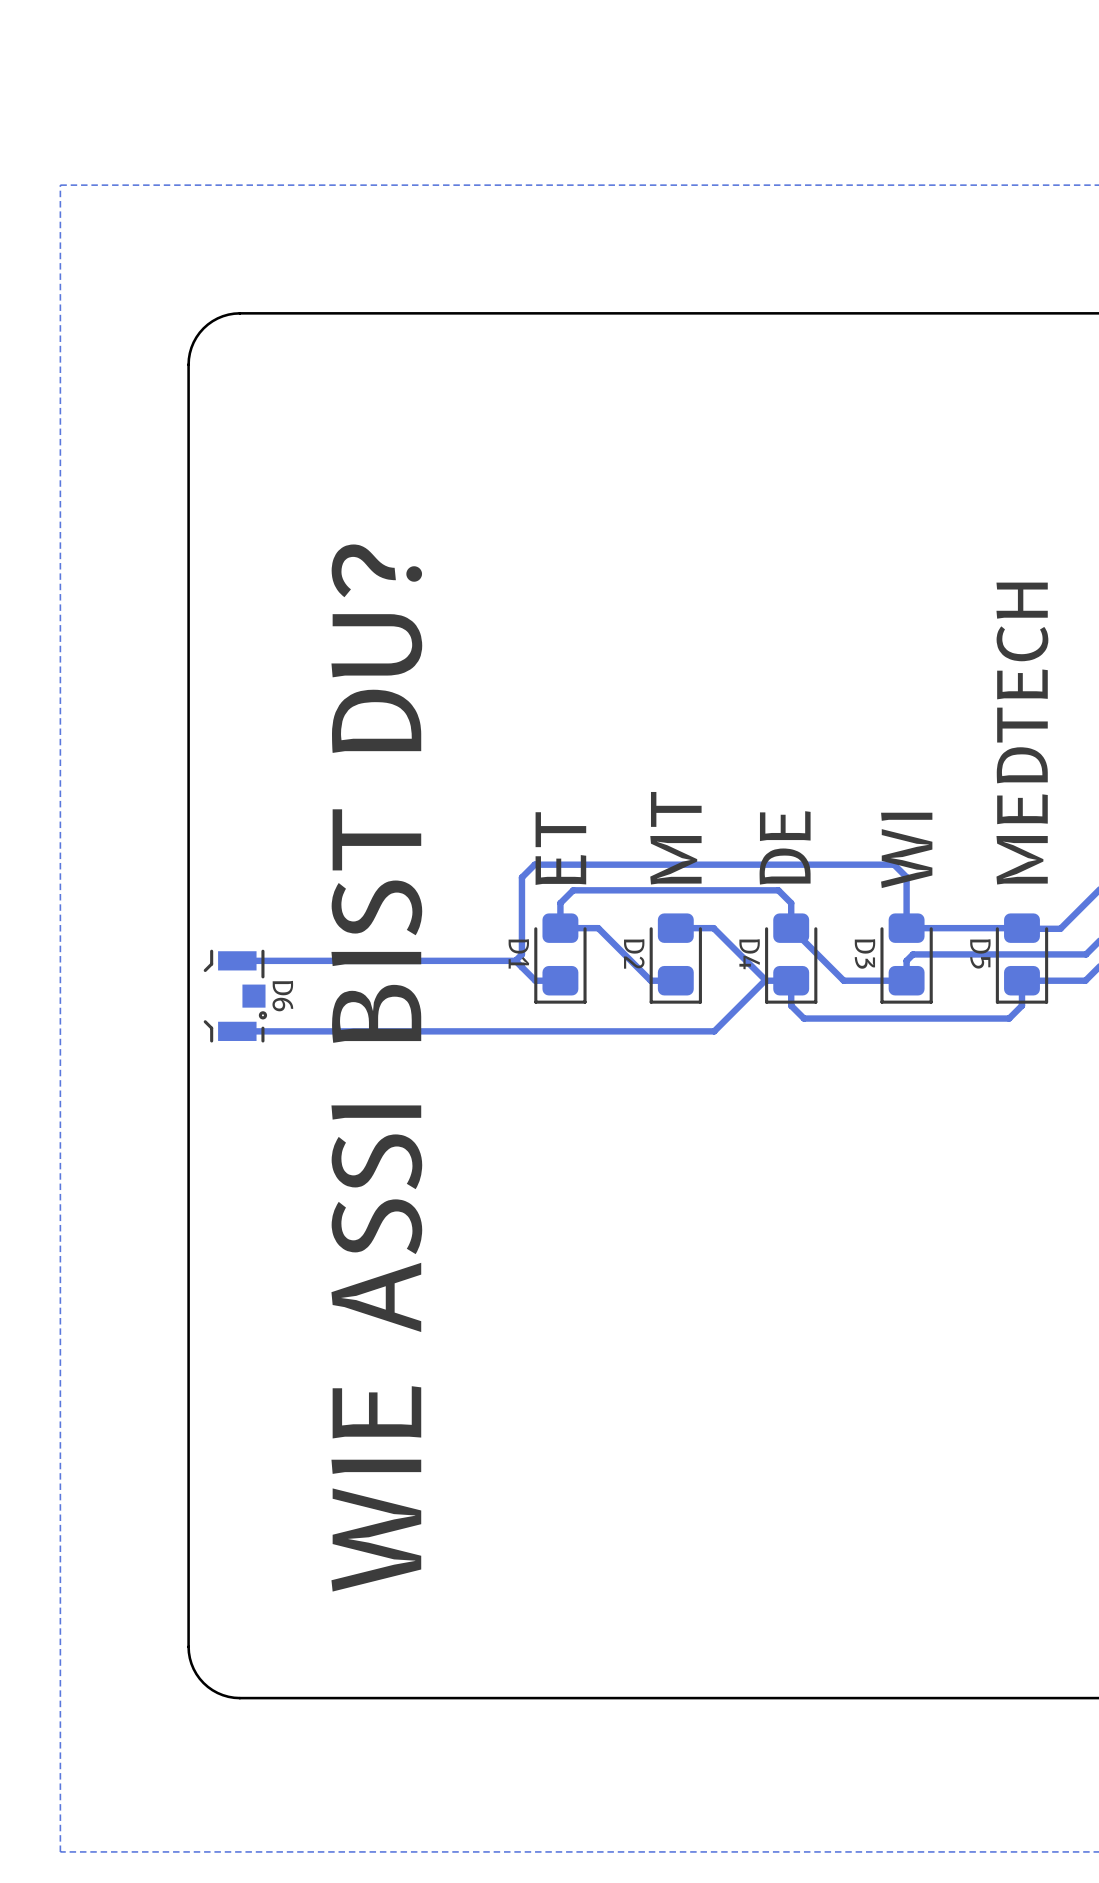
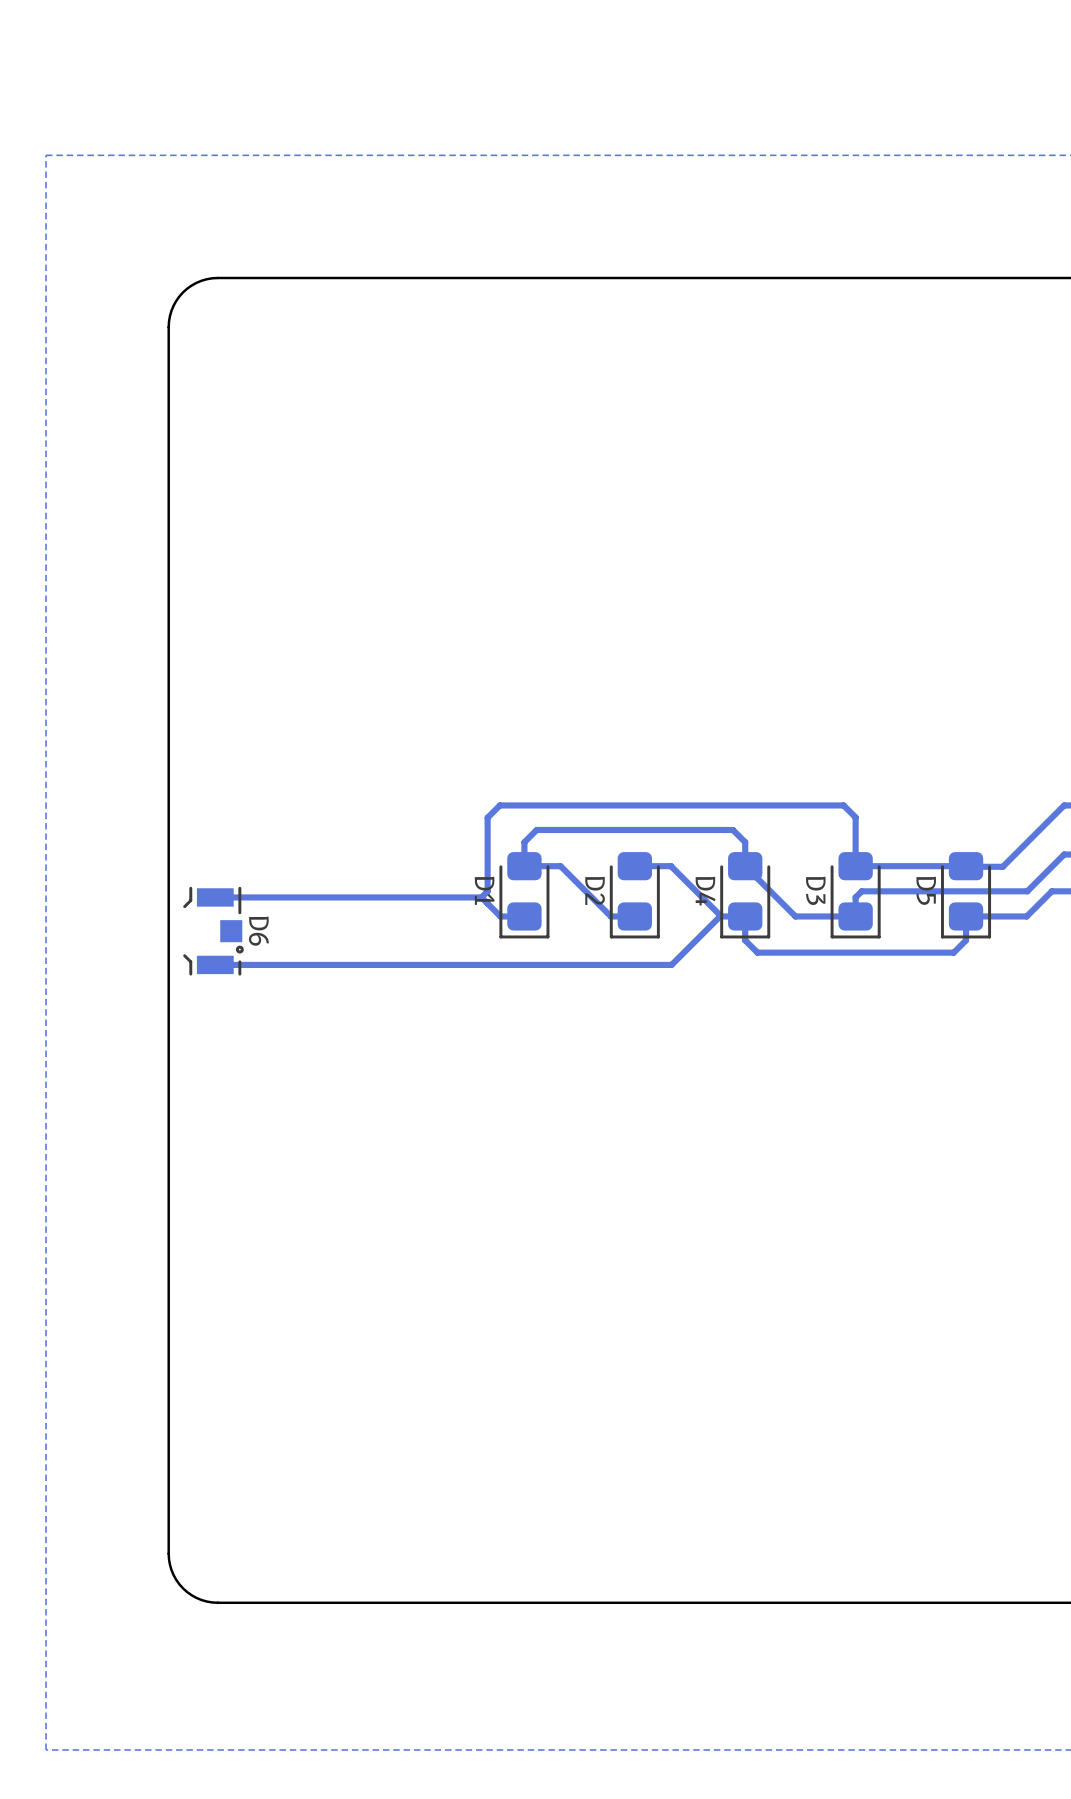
text: MEDTECH (1022, 733) -> none
text: MT (675, 838) -> none
text: DE (785, 847) -> none
text: ET (560, 848) -> none
text: WI (906, 850) -> none
text: WIE ASSI BIST DU? (376, 1068) -> none

